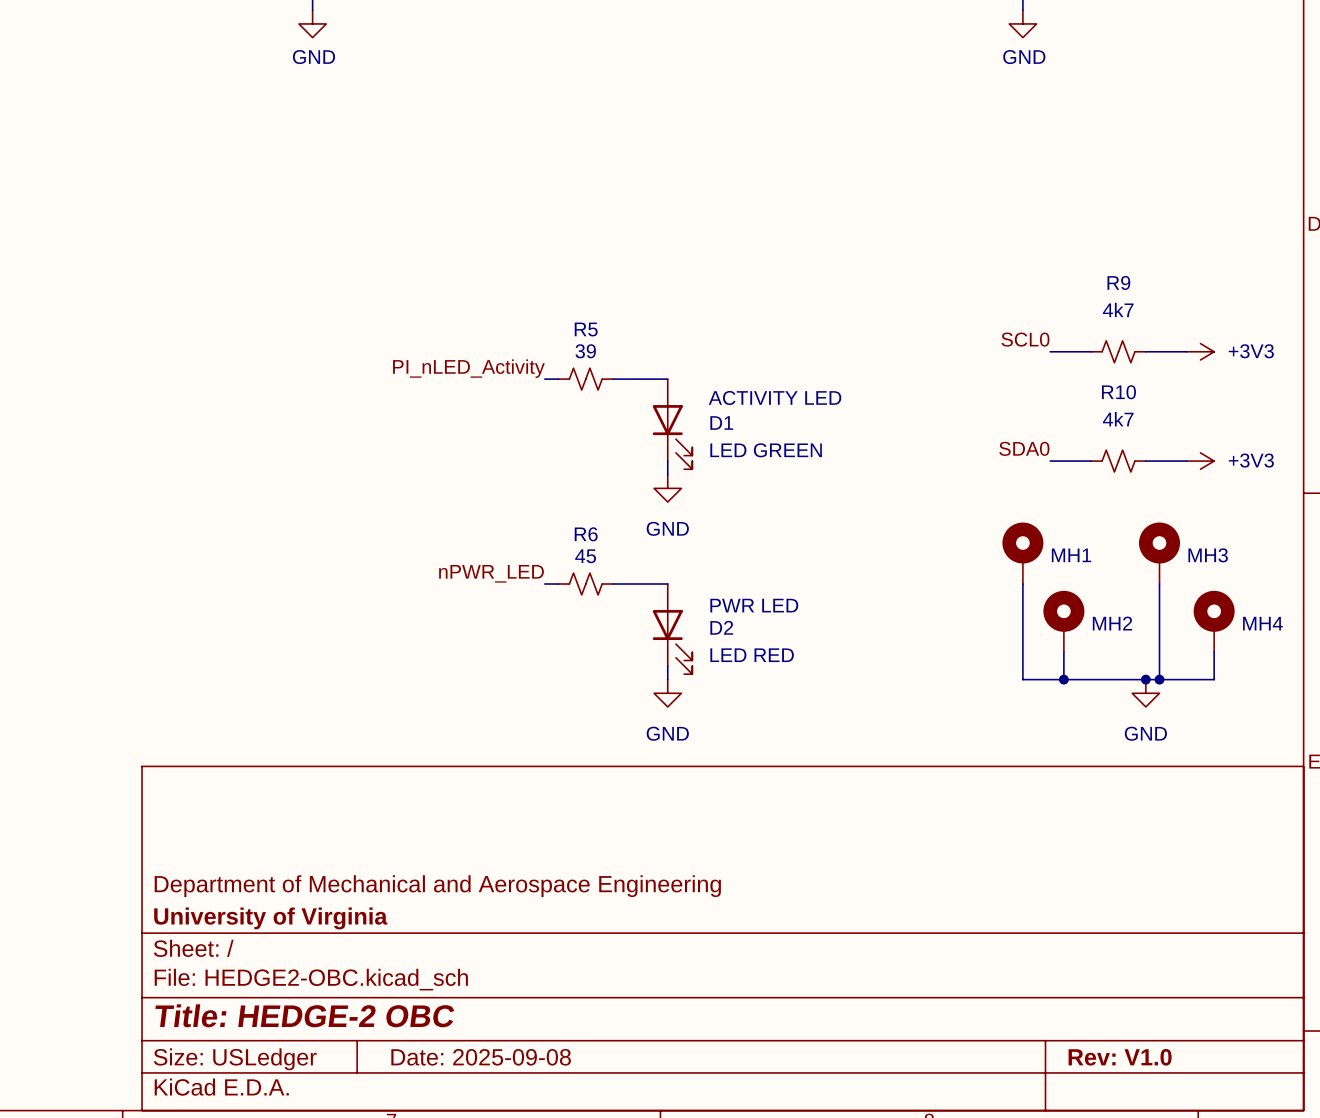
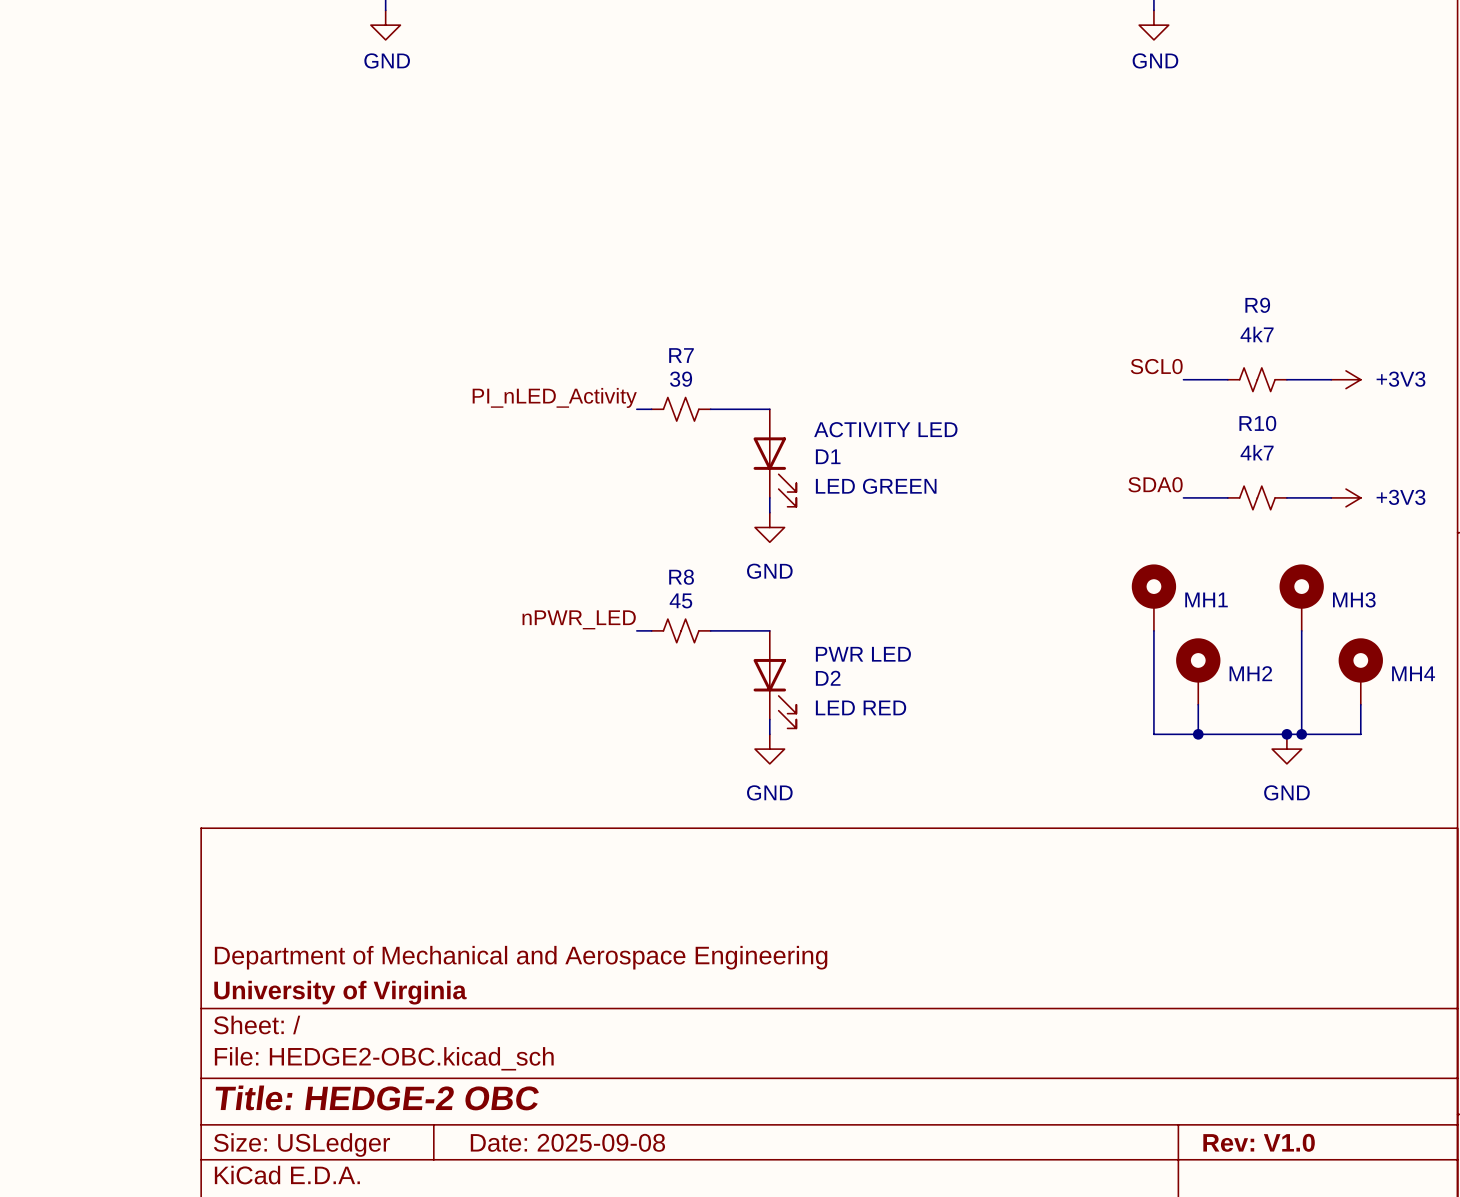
R5 name: R5 (586, 329) -> R7 (681, 355)
R6 name: R6 (586, 534) -> R8 (681, 577)

